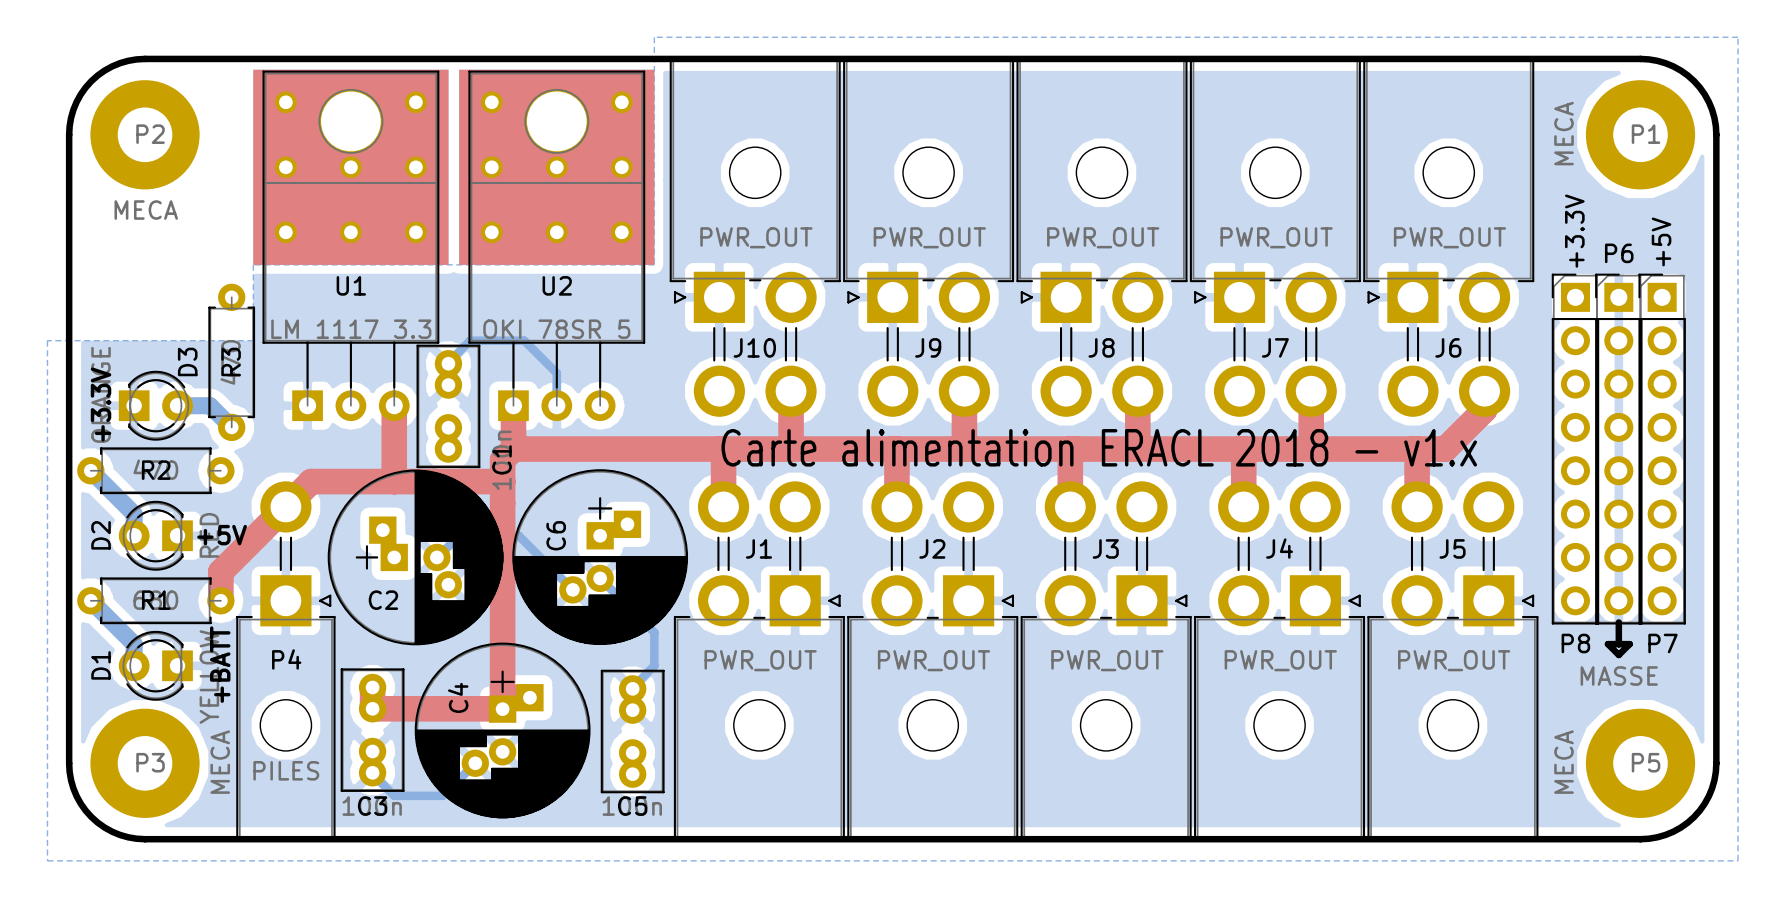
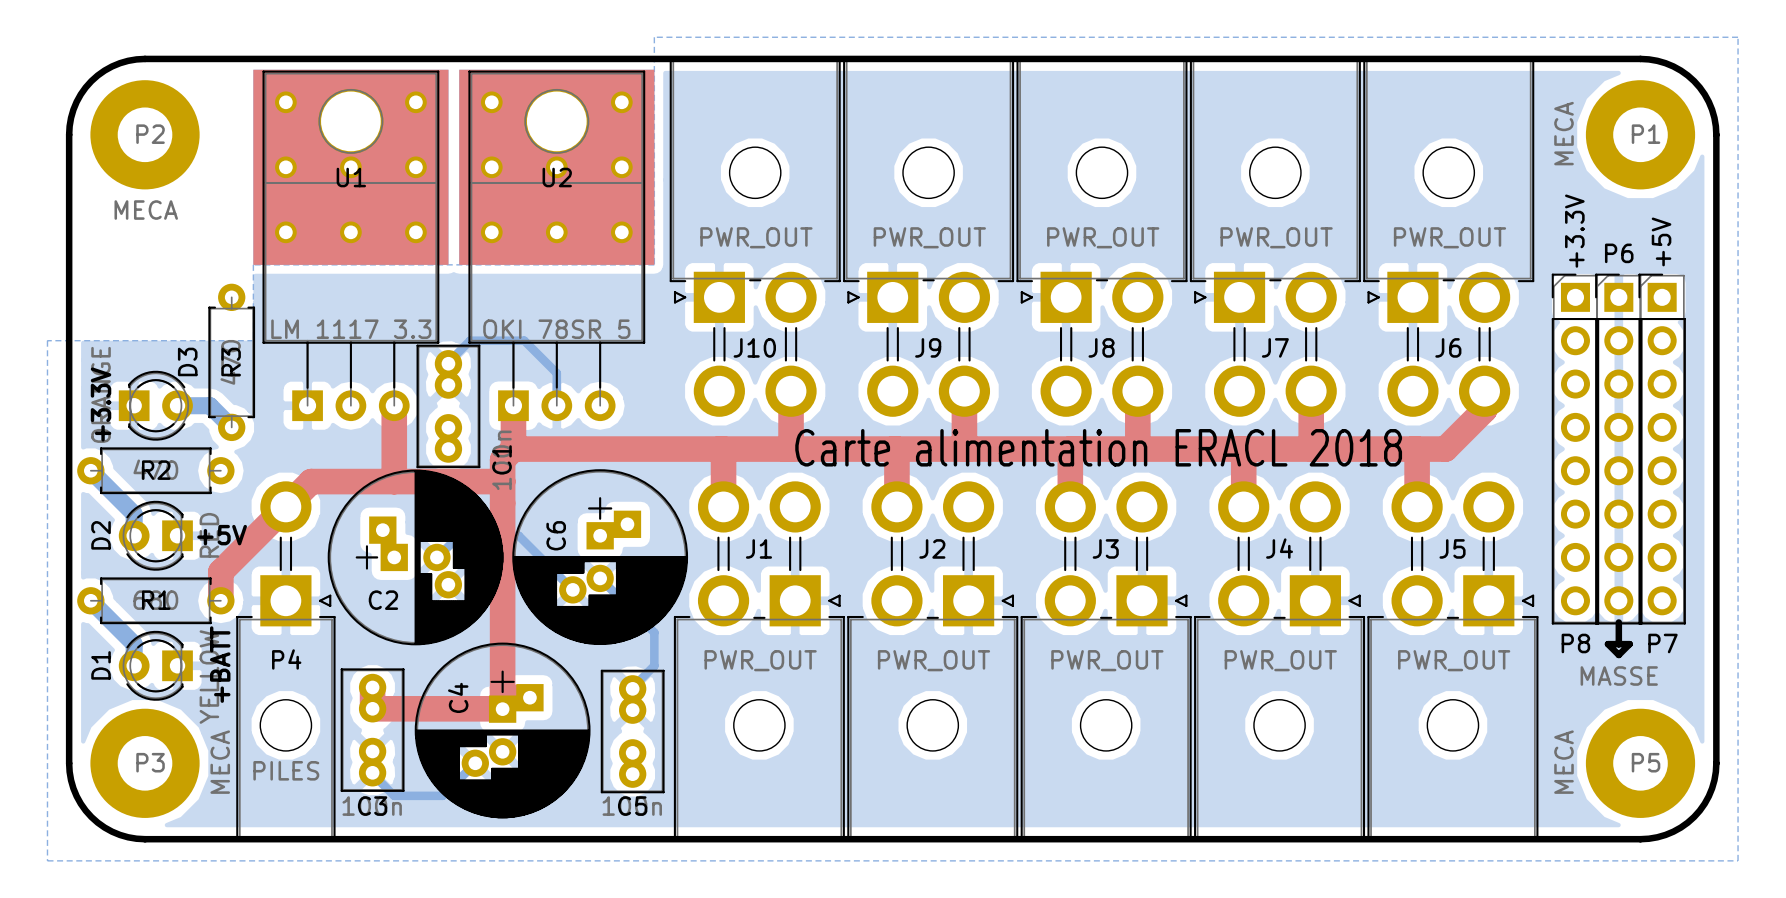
U1 name position: U1 (351, 285) -> U1 (351, 177)
U2 name position: U2 (557, 285) -> U2 (557, 177)
text: Carte alimentation ERACL 2018 - v1.x (1099, 447) -> Carte alimentation ERACL 2018 (1098, 447)

